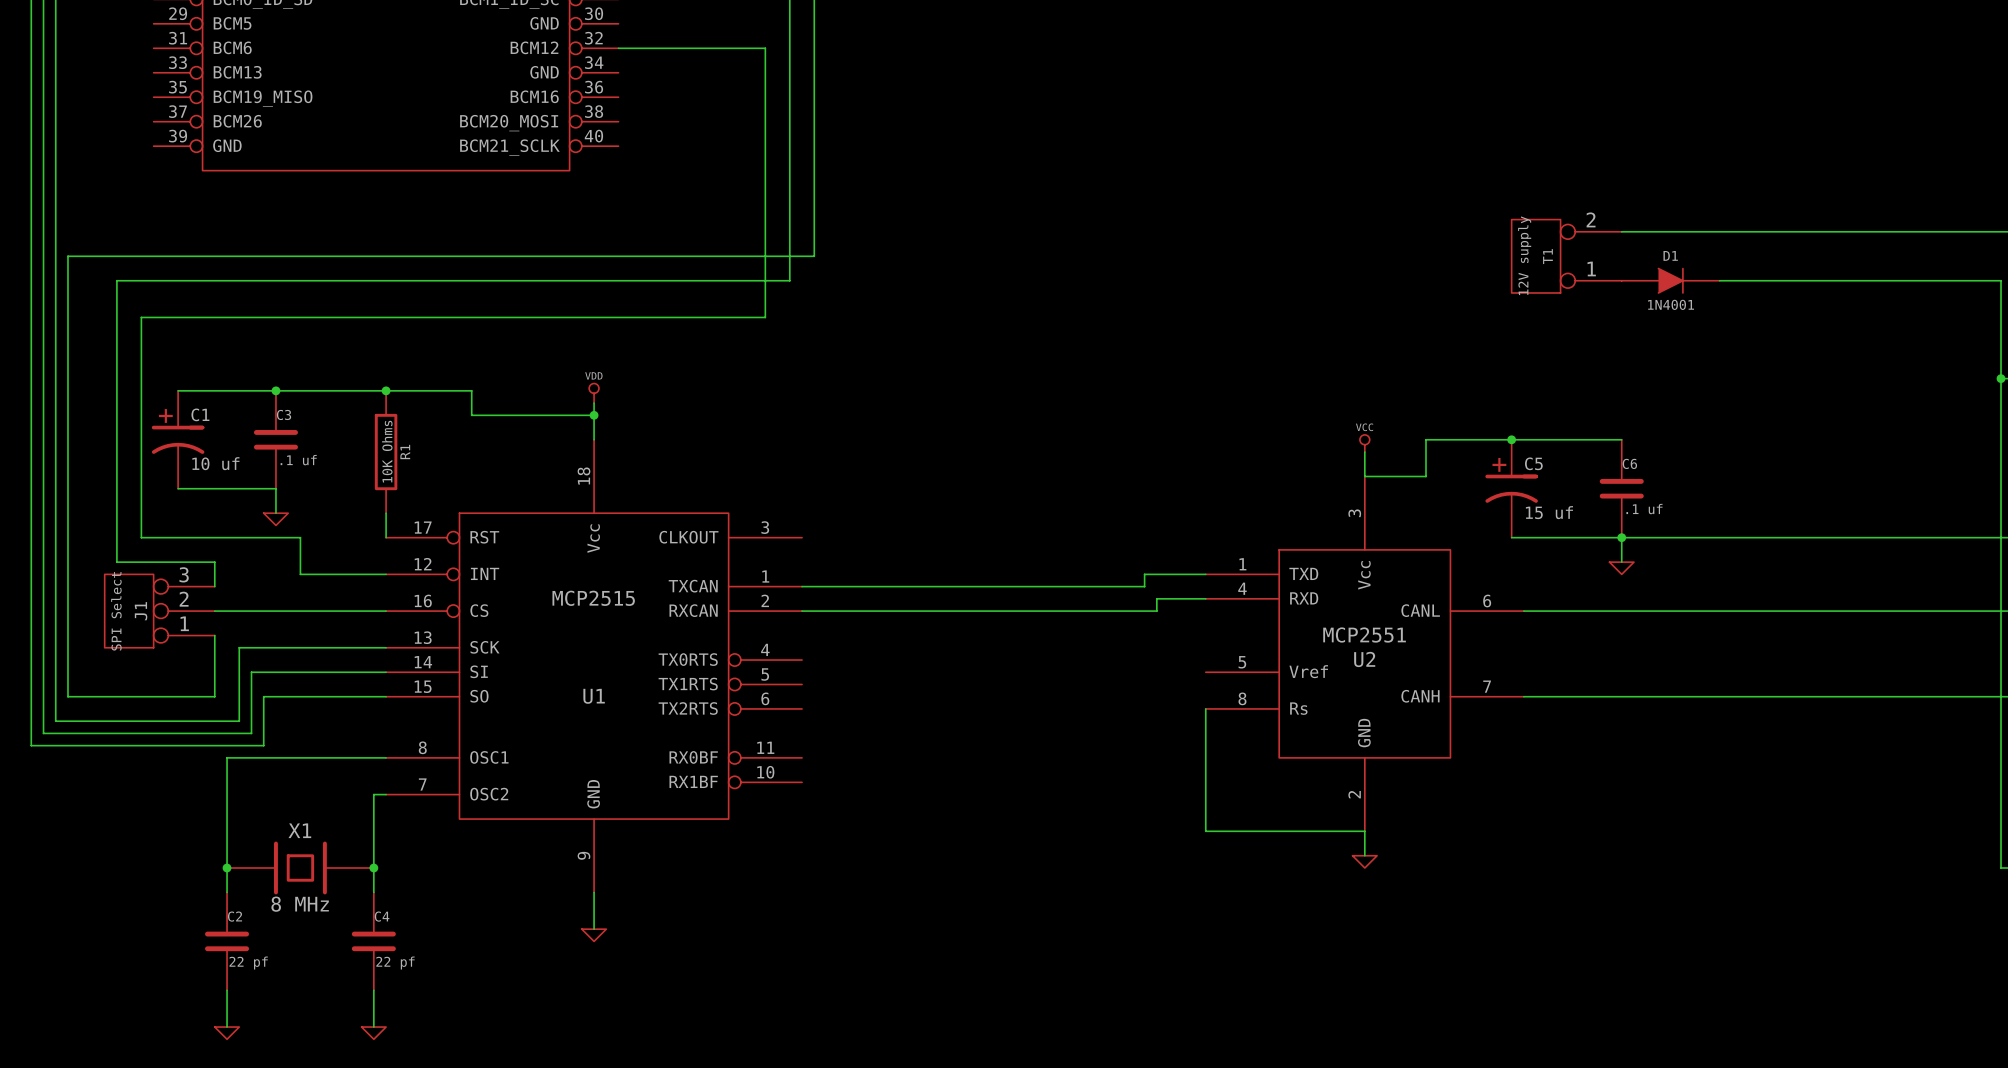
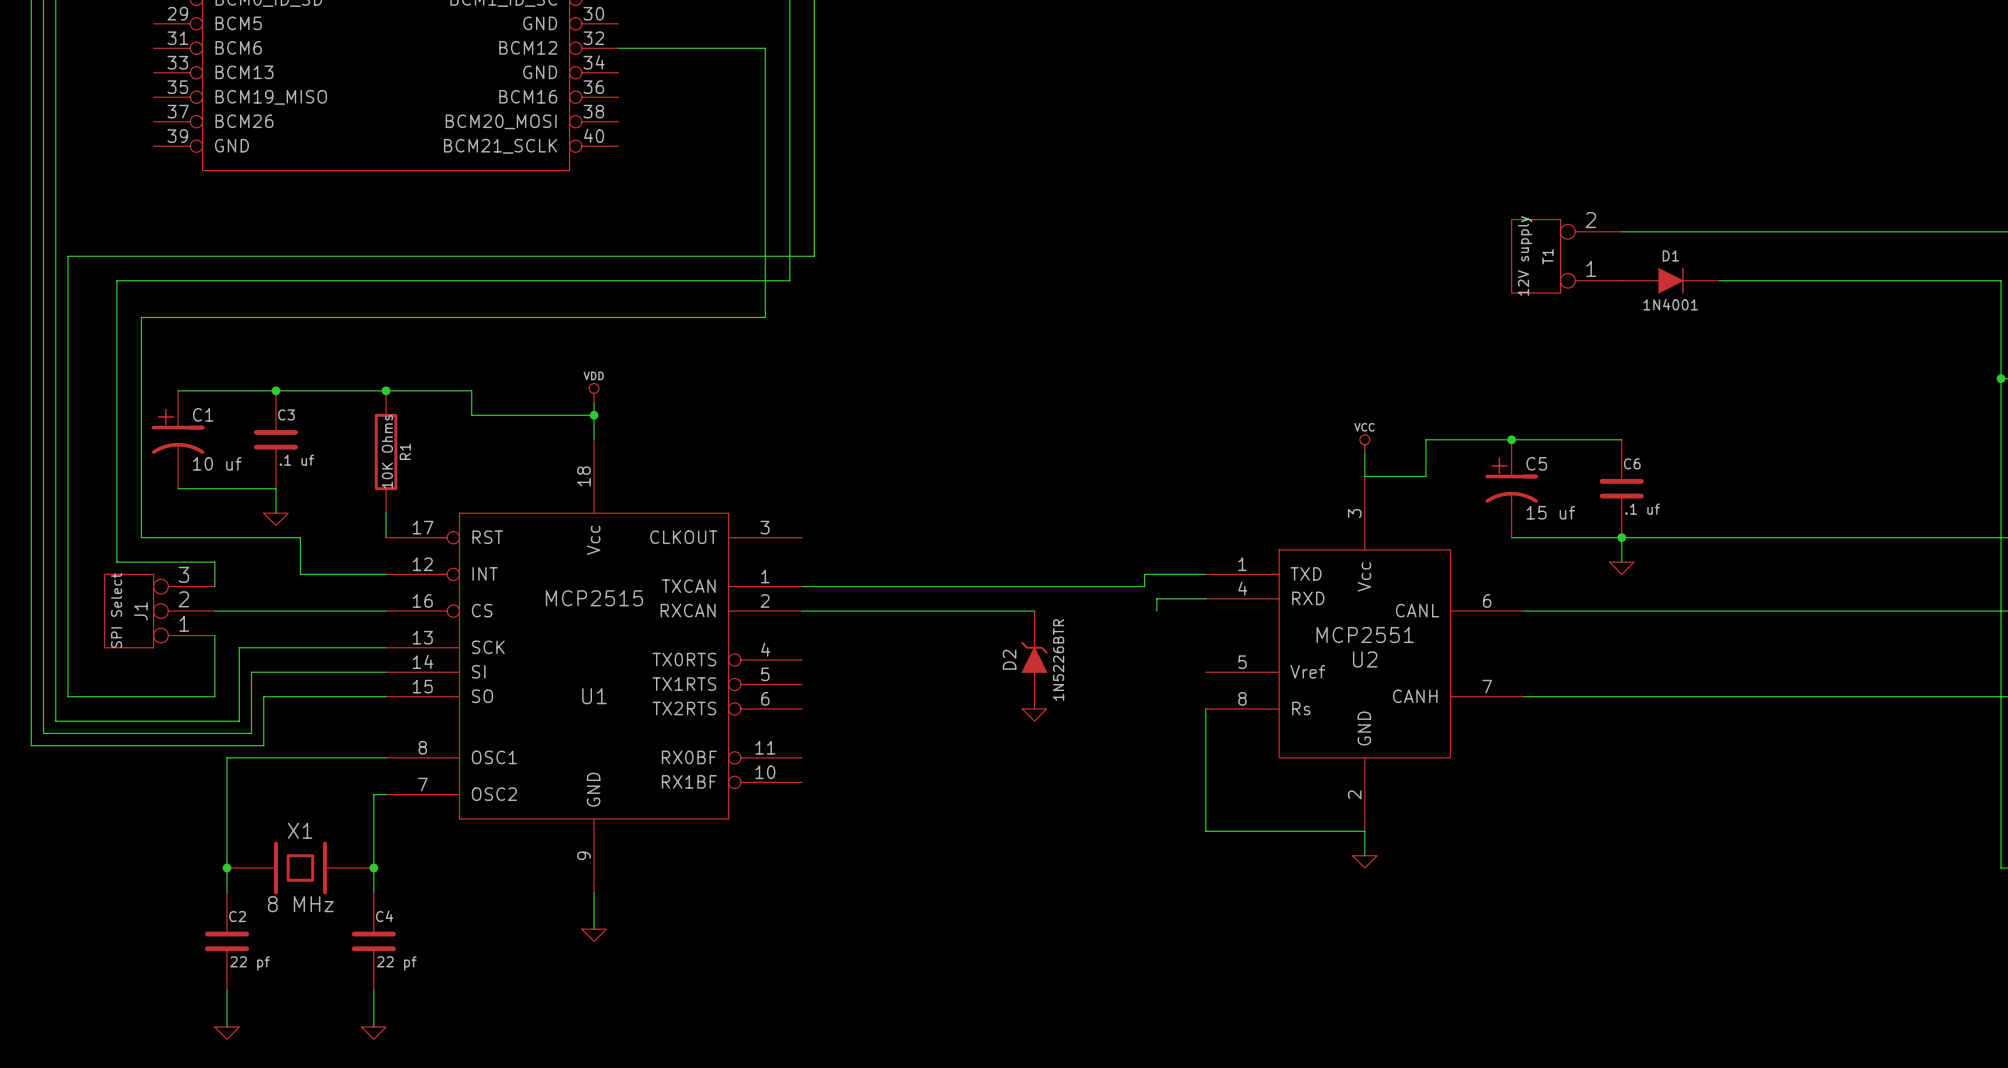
wire: (1034, 611) (1156, 611) -> none
D2: none -> 1N5226BTR (1034, 660)
power symbol: none -> (1034, 715)

